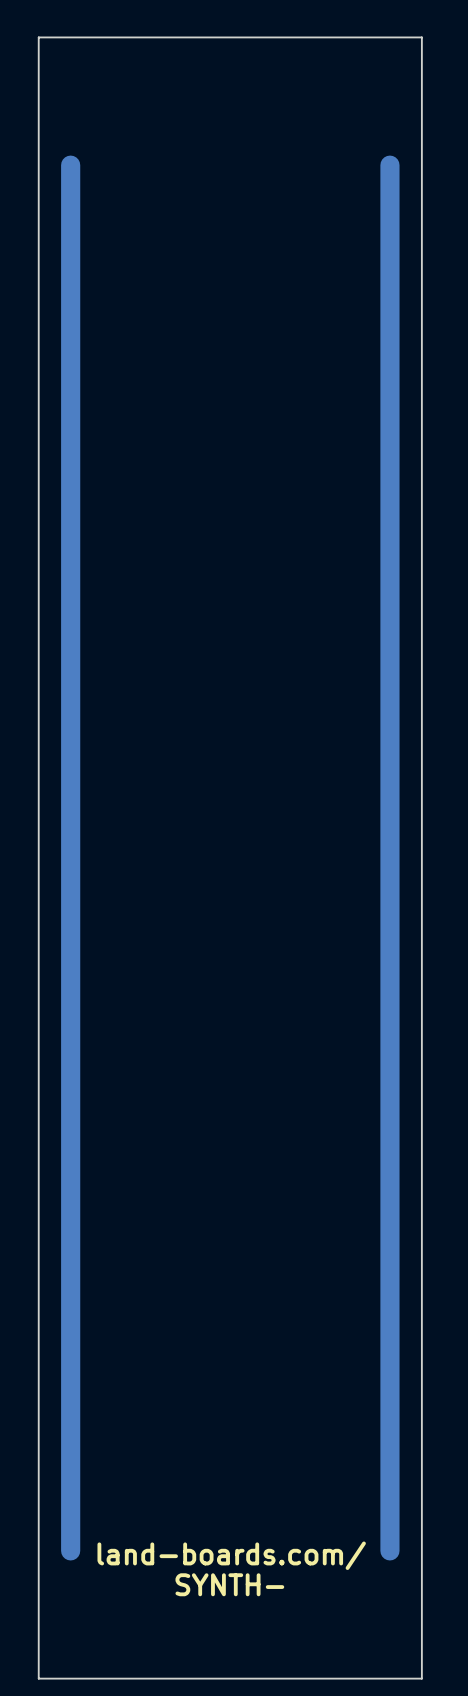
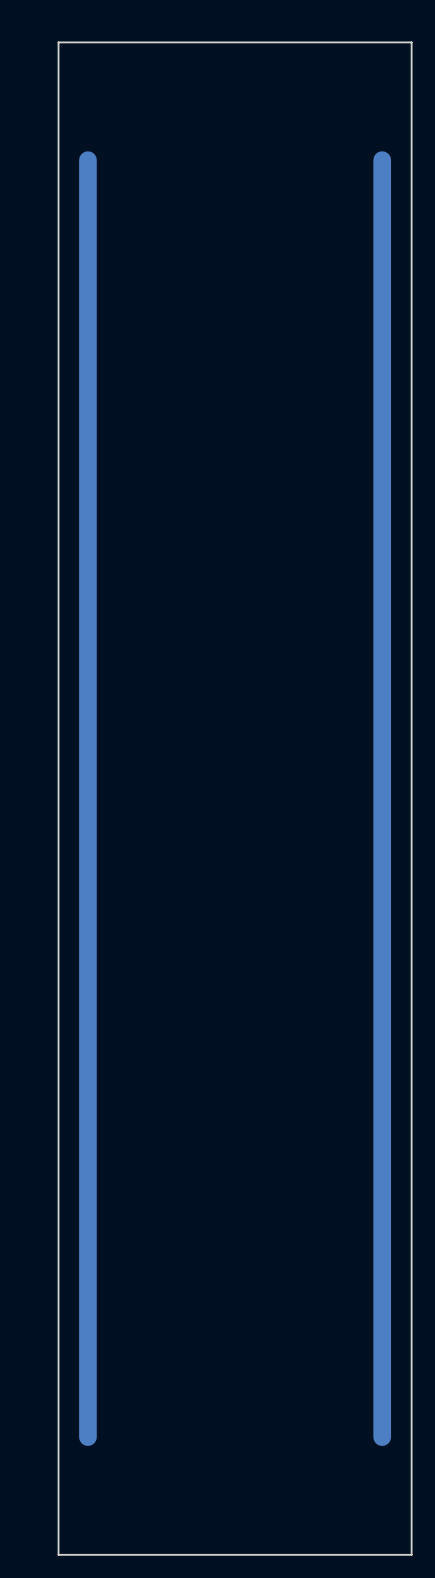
text: land-boards.com/ (231, 1555) -> none
text: SYNTH- (229, 1584) -> none

